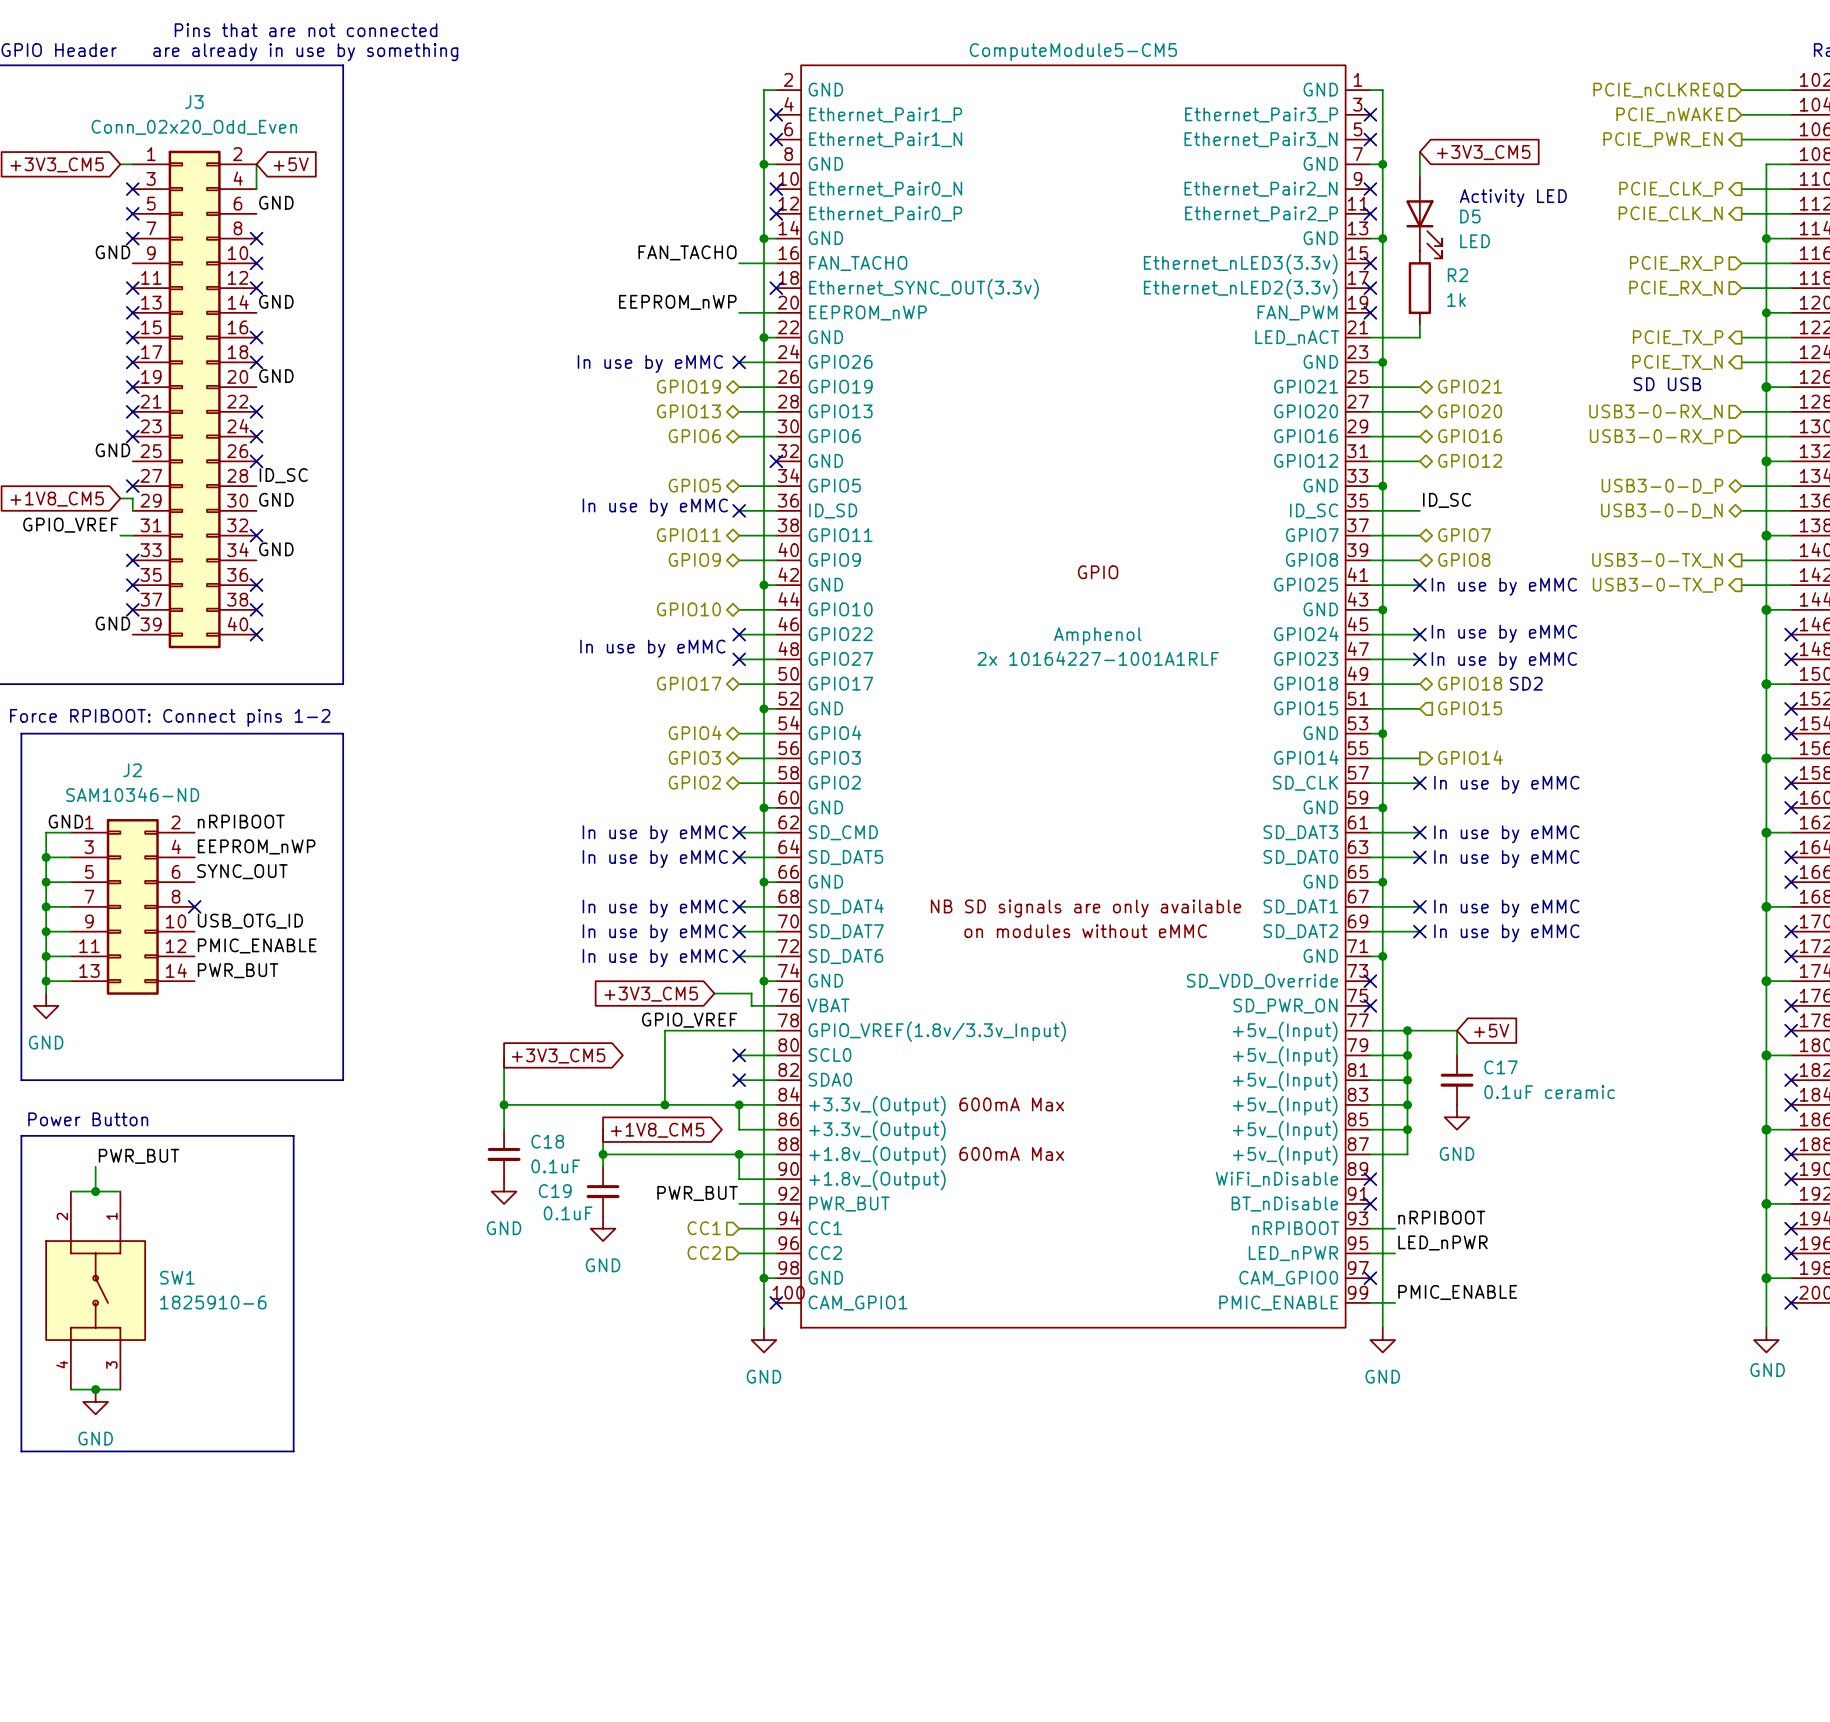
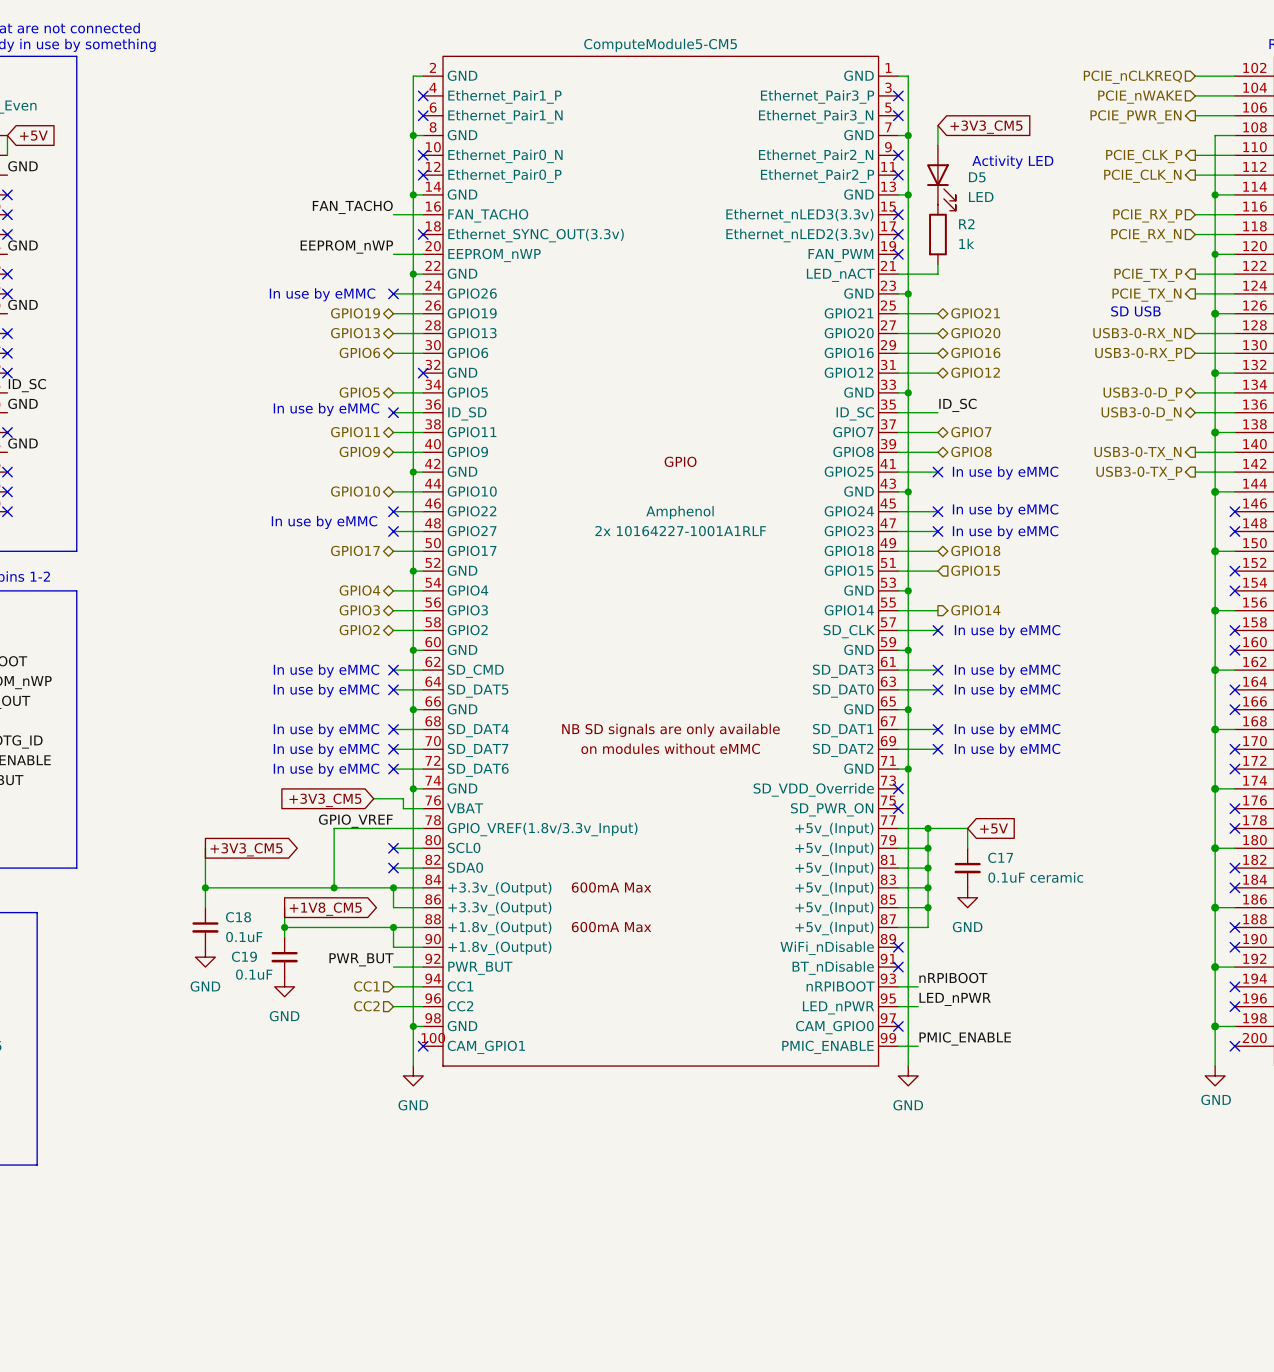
text: SD2 (1526, 683) -> none

